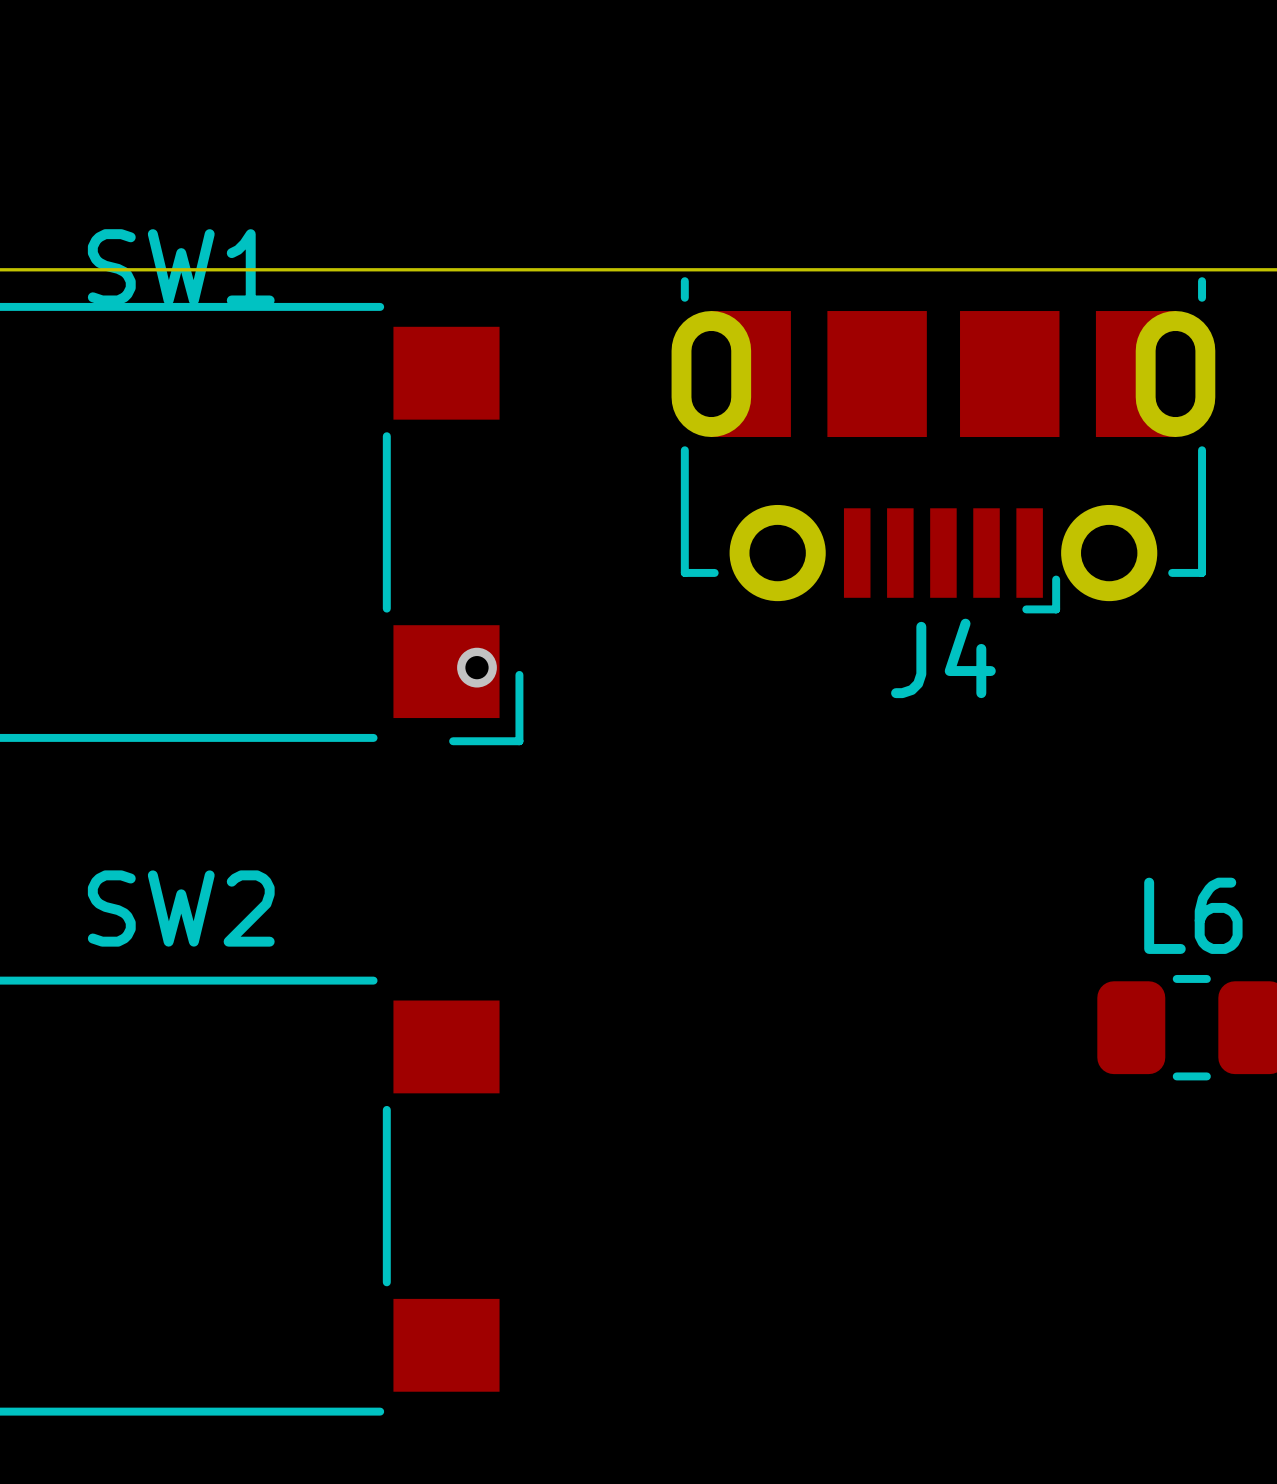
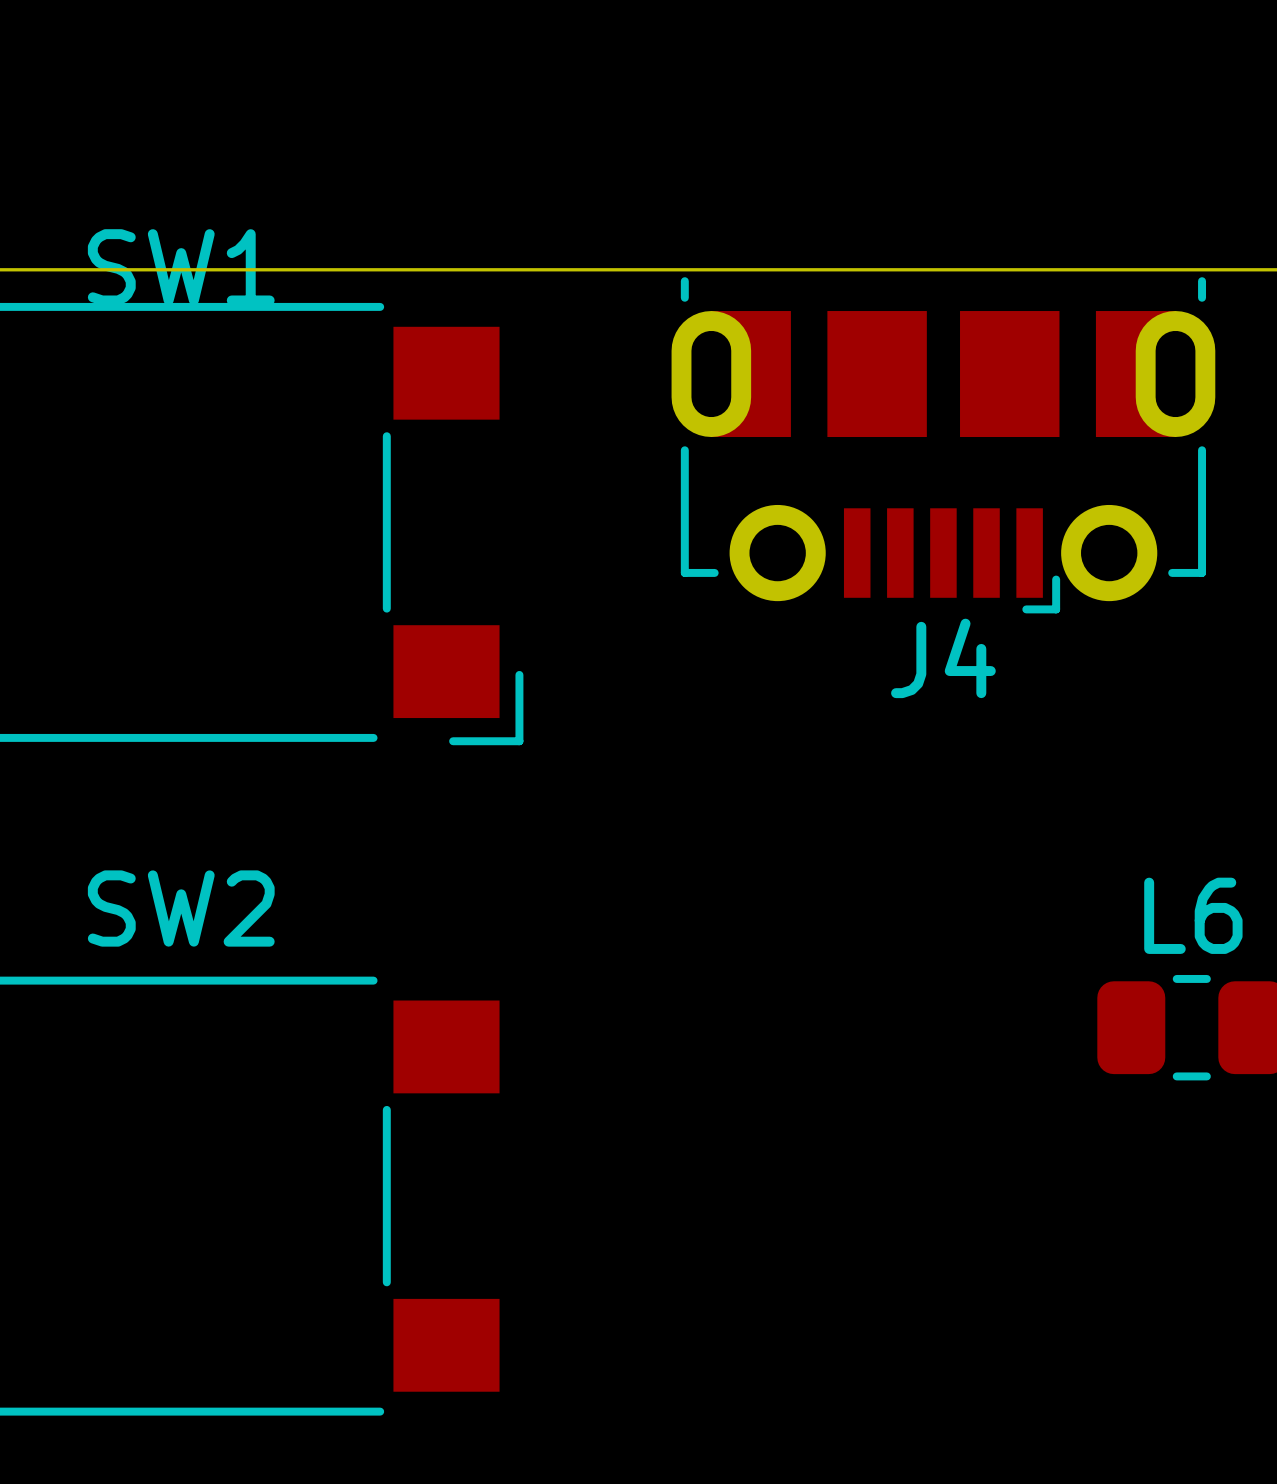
via: (476, 667) -> none

